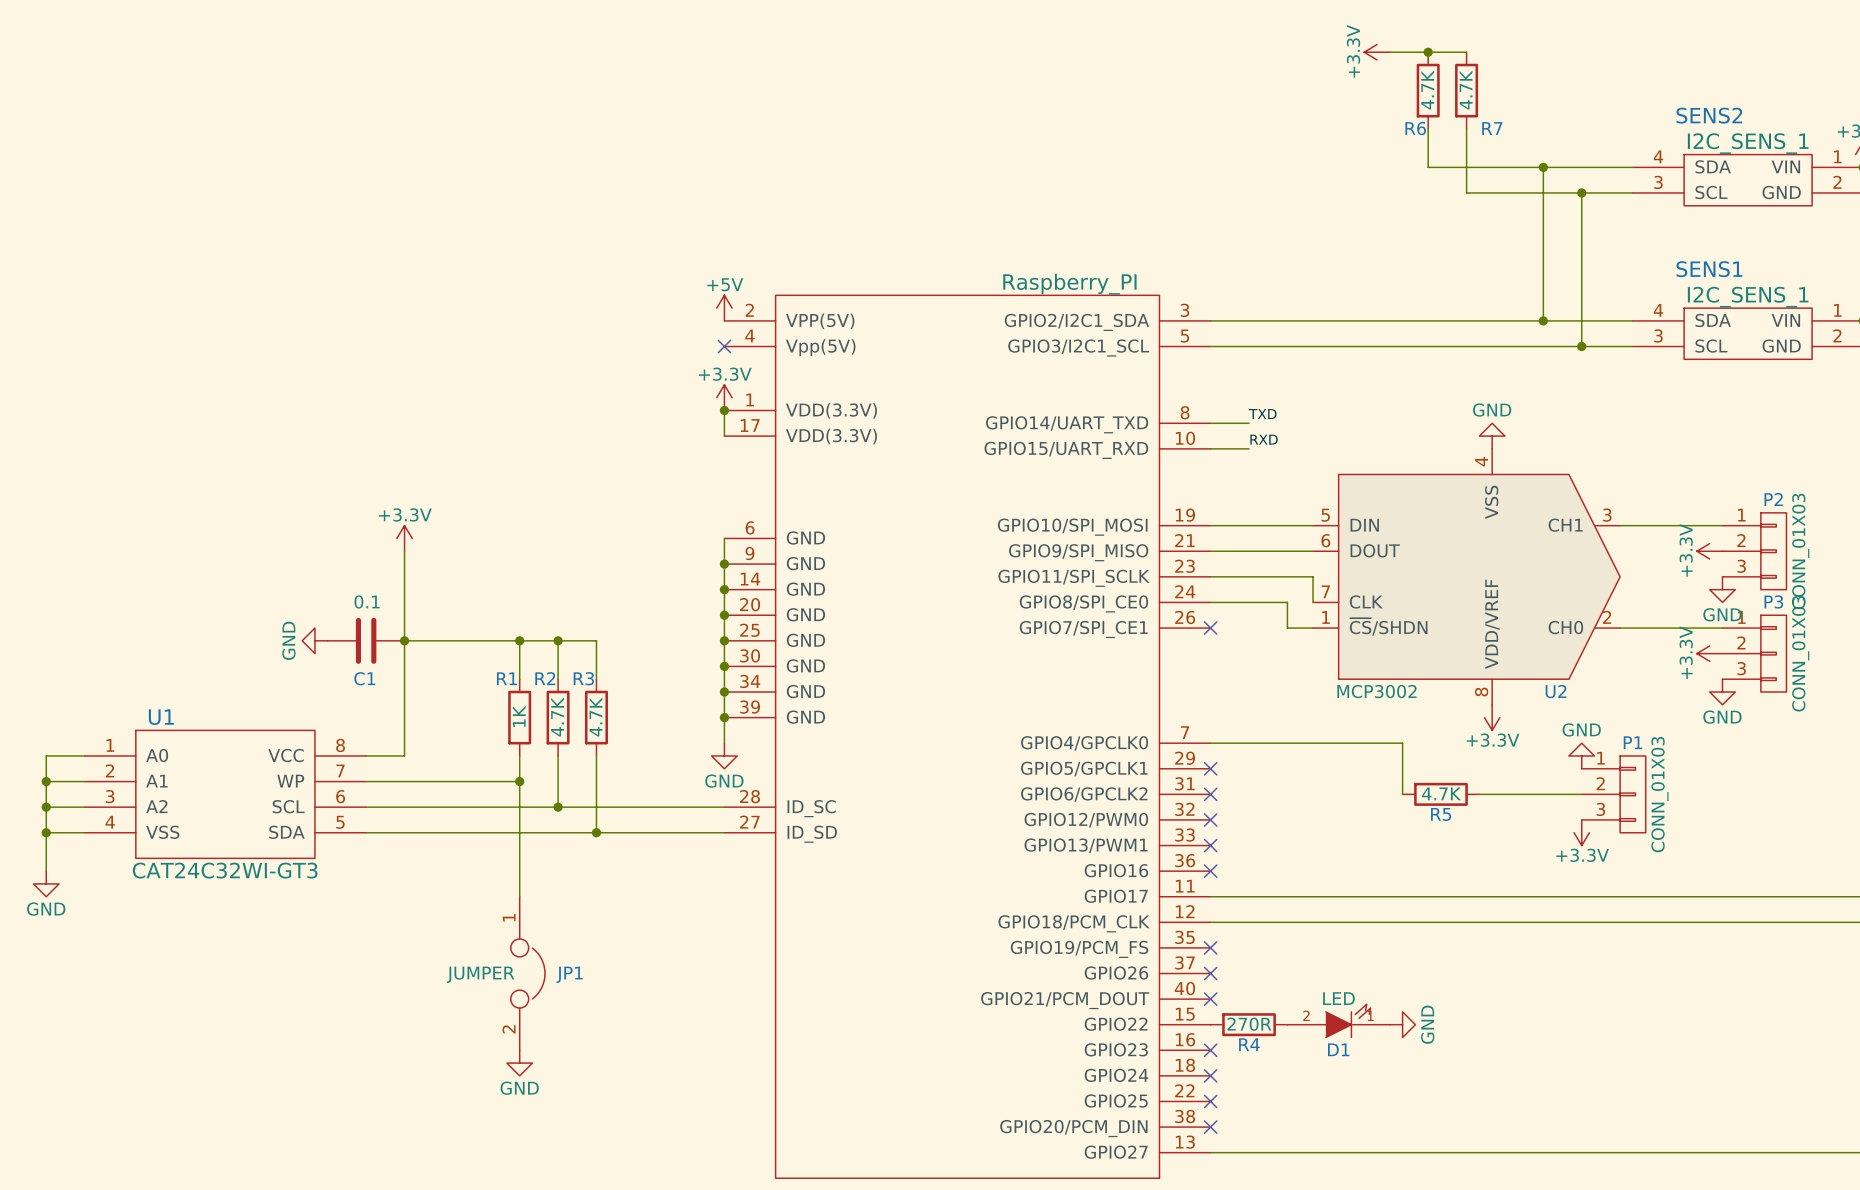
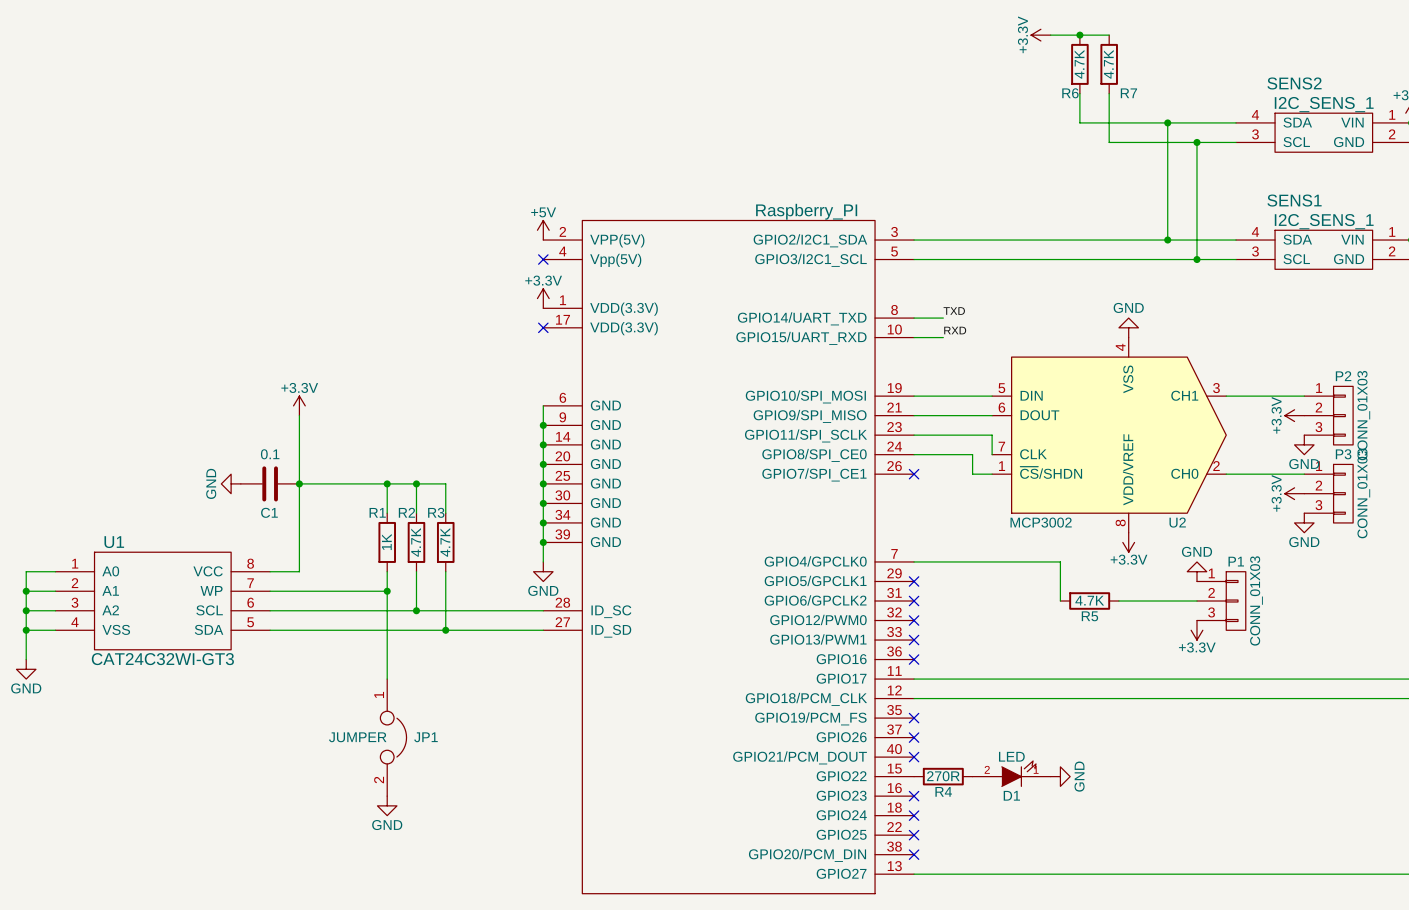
wire: (724, 410) (724, 436) -> none
junction: (724, 410) -> none
no-connect mark: none -> (543, 327)

